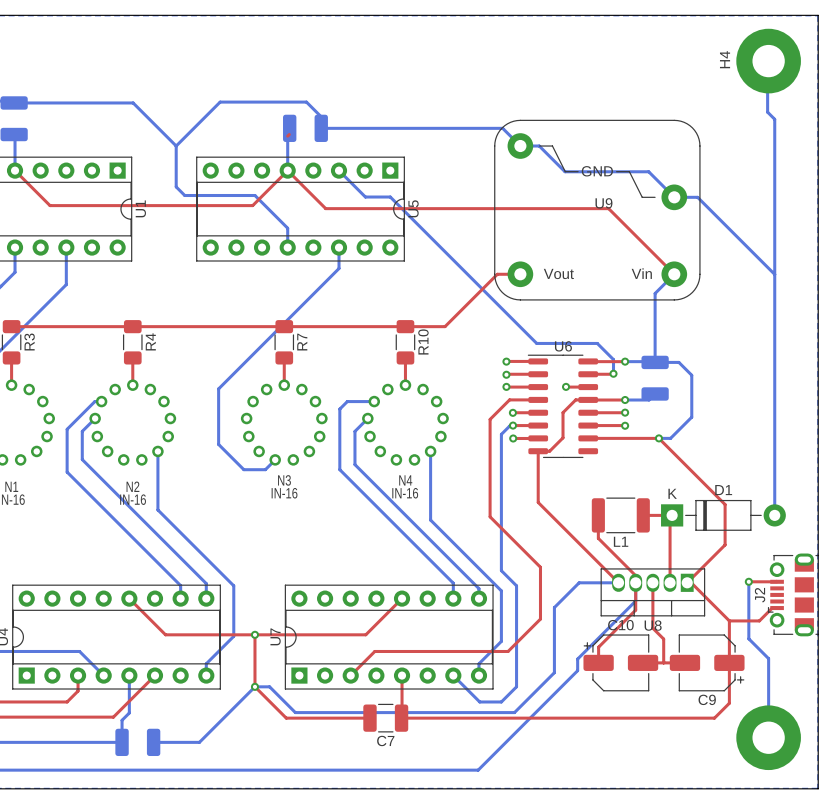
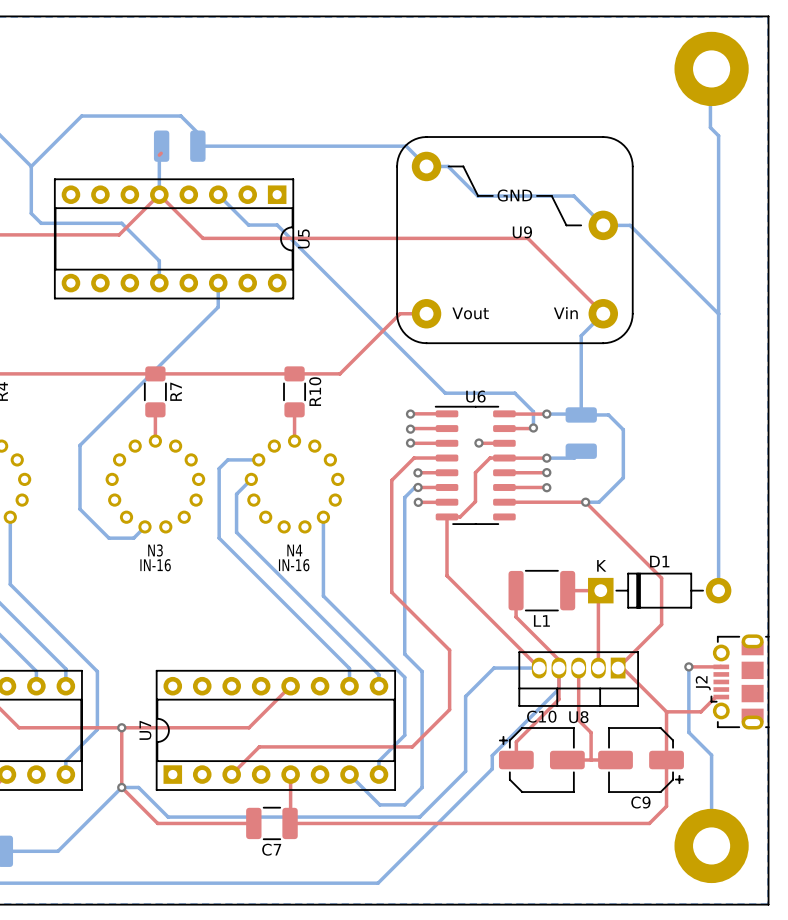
H4 name: H4 (725, 59) -> none

